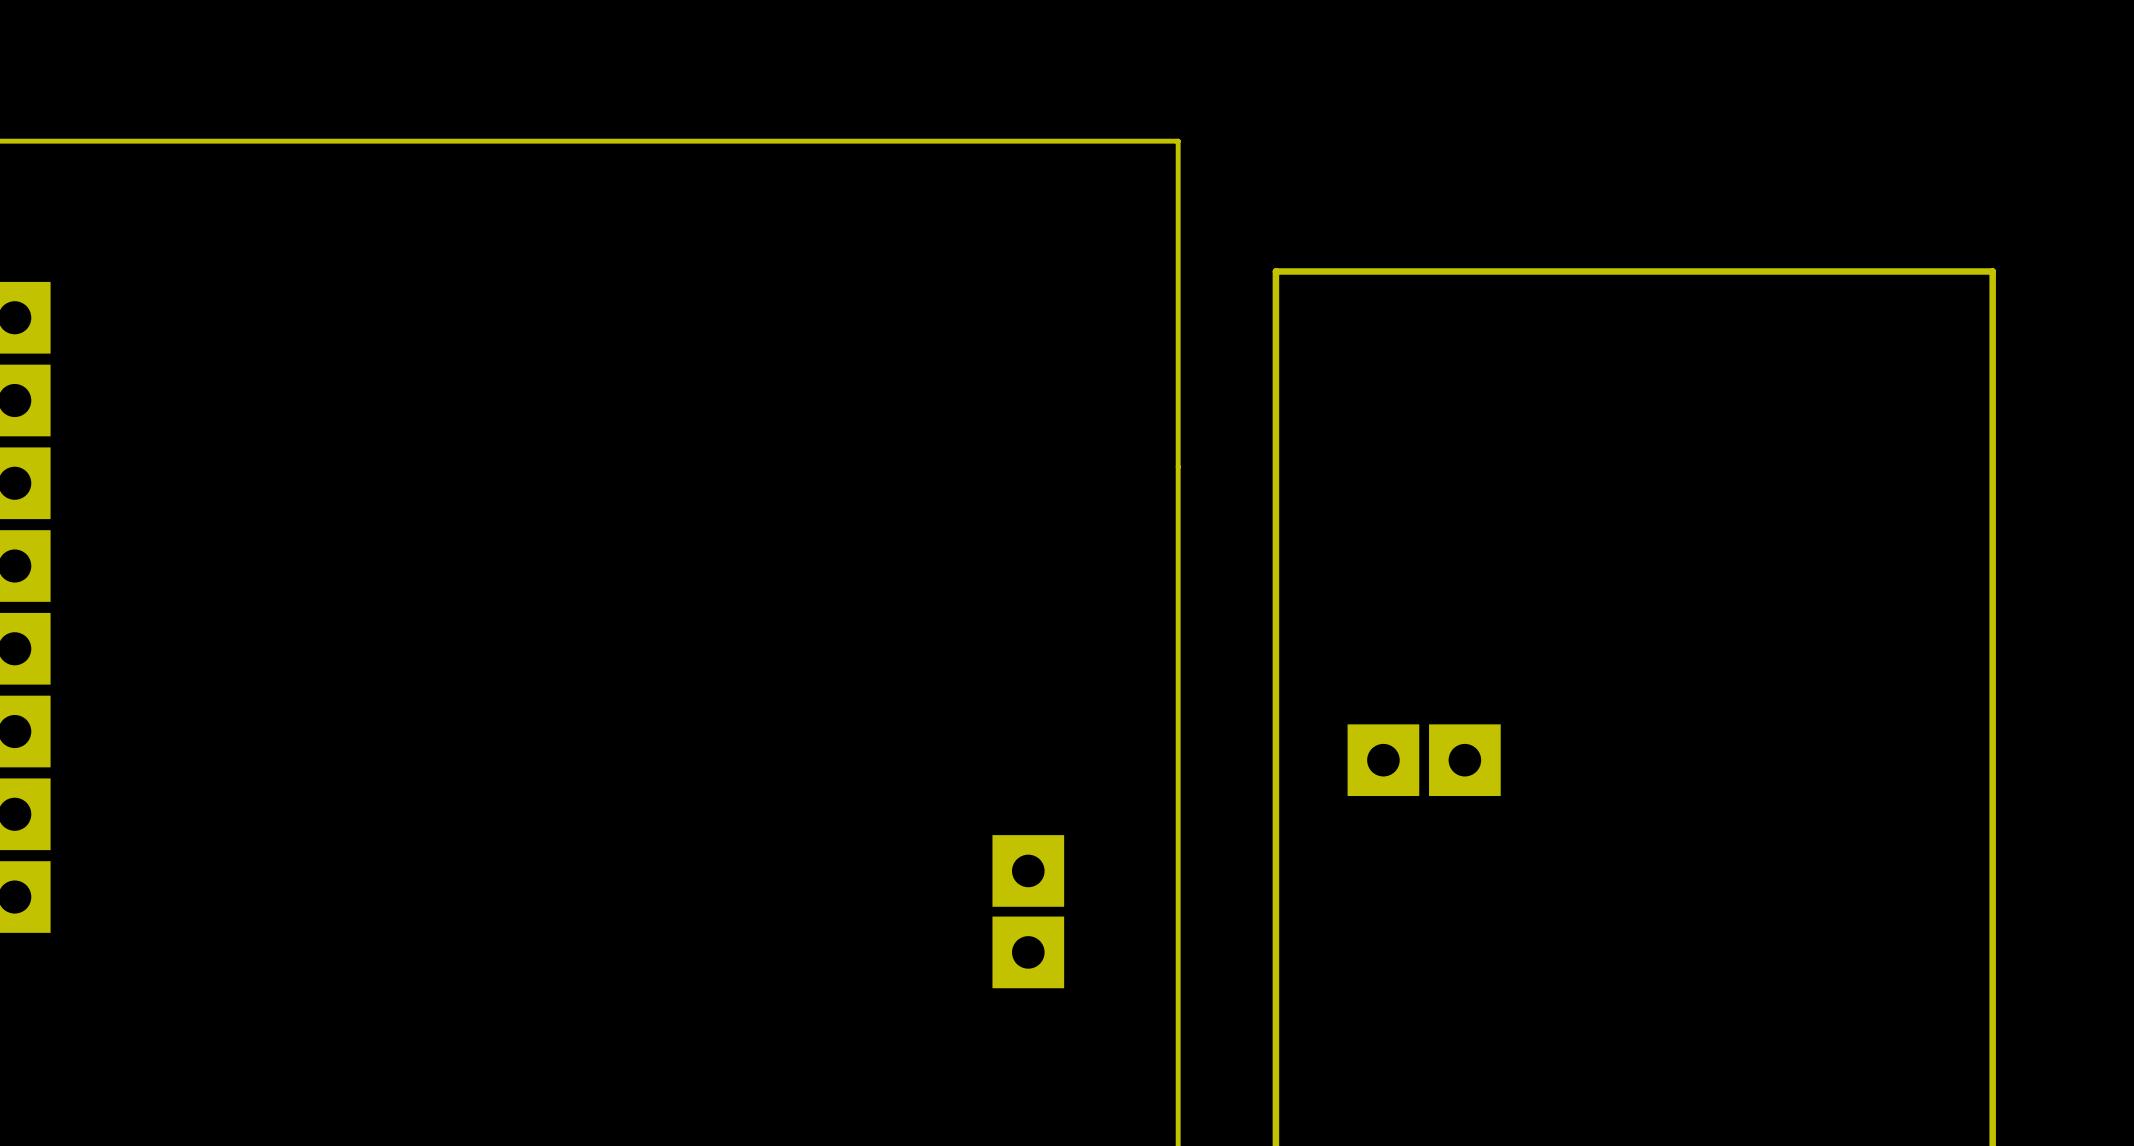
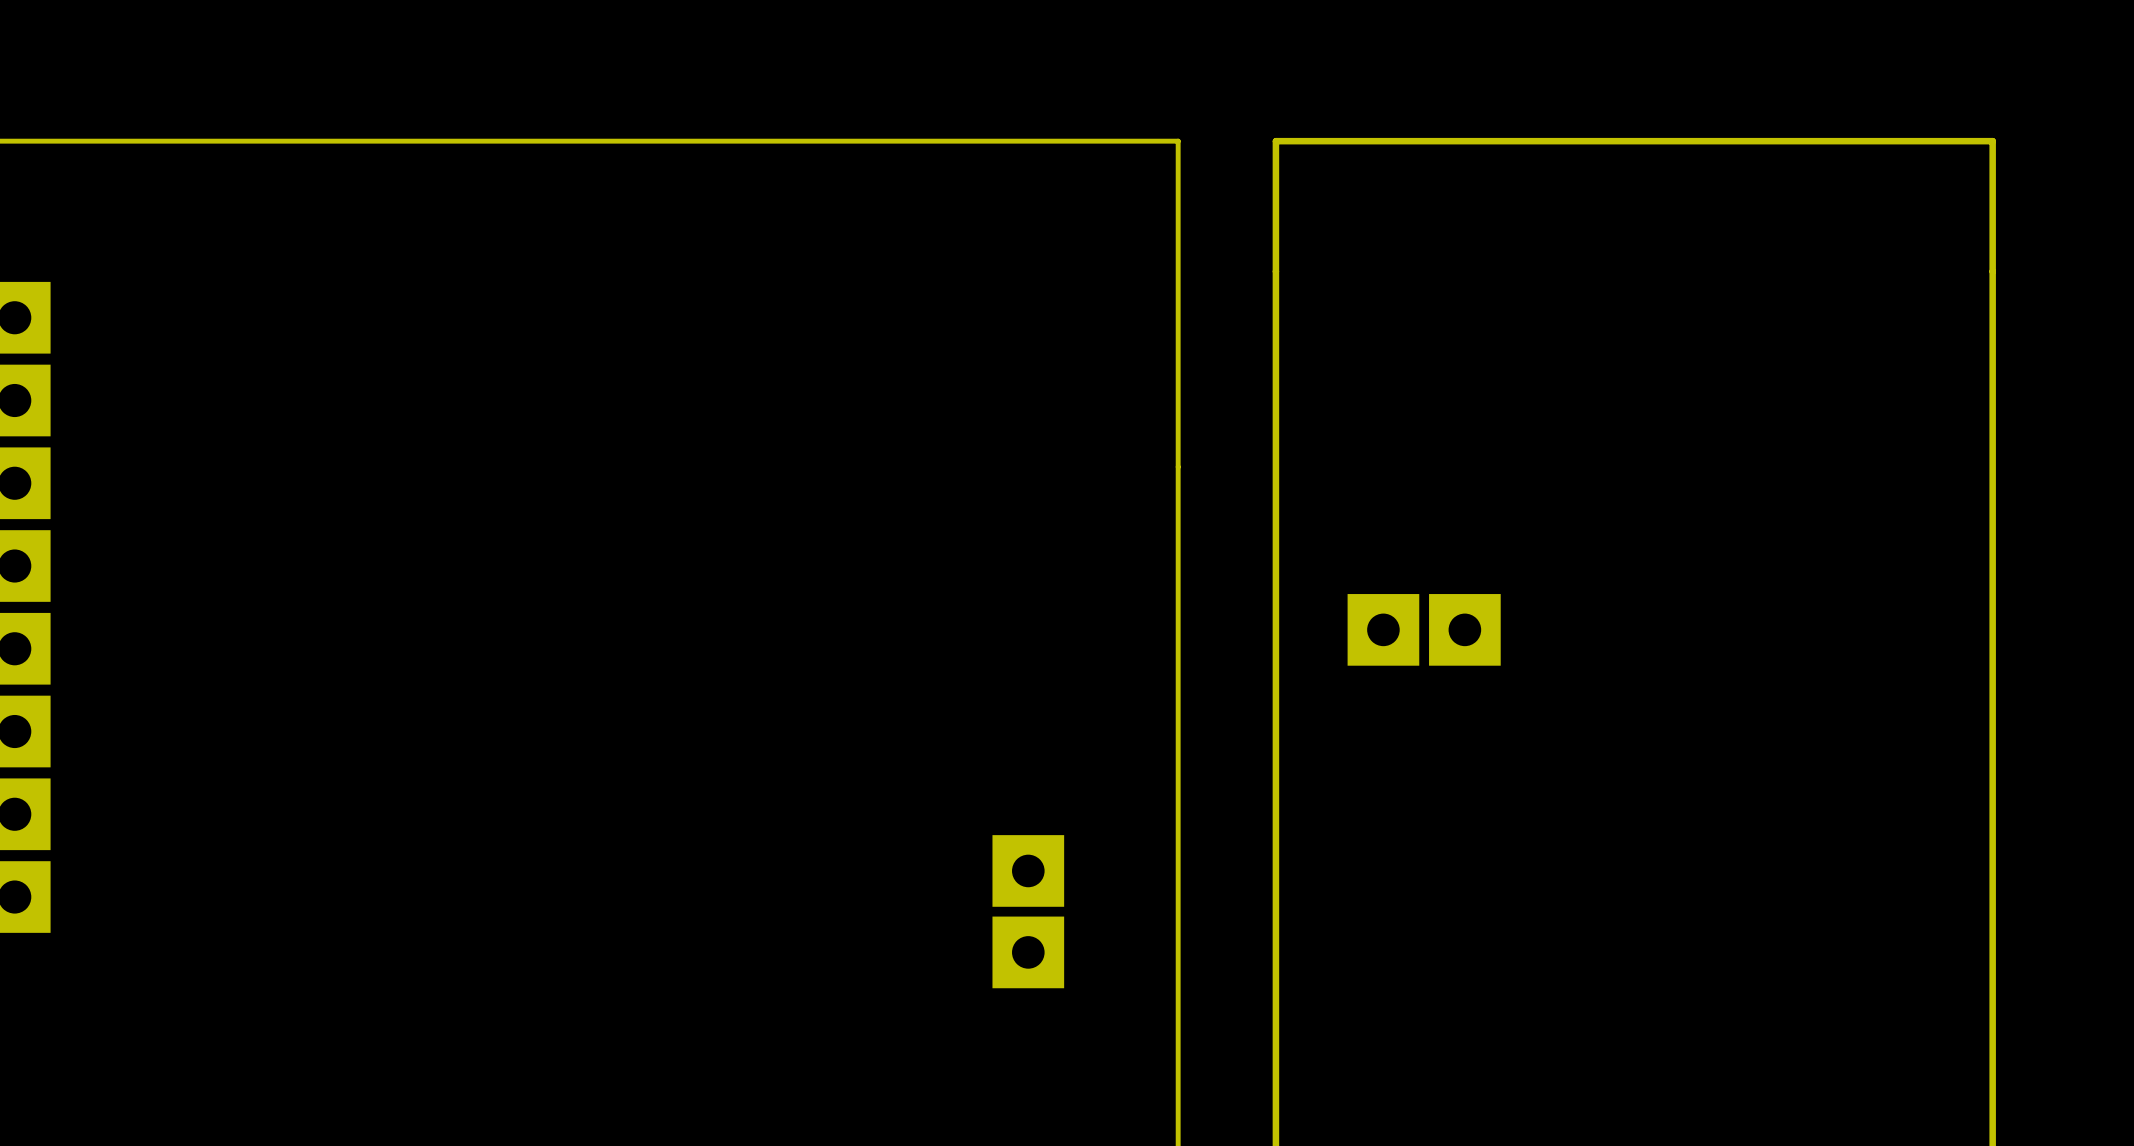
board edge: (1992, 271) (1275, 271) -> (1992, 271) (1992, 141) (1275, 141) (1275, 271)
part position: (1424, 760) -> (1424, 629)

